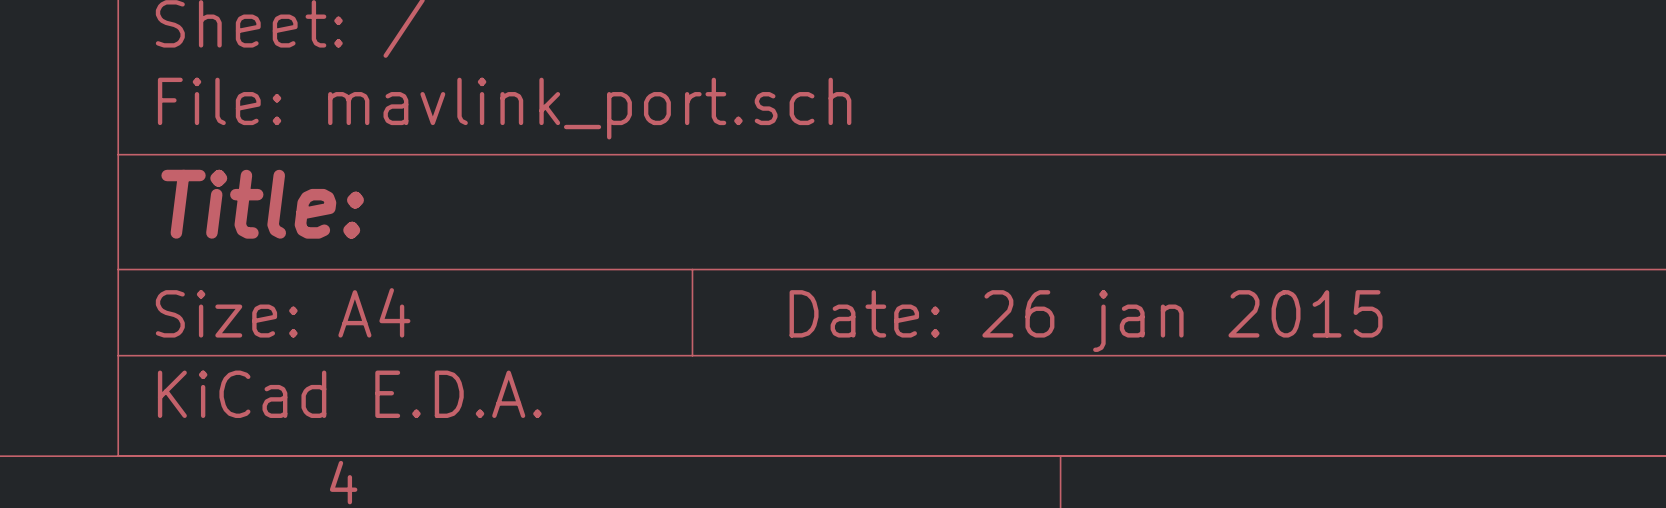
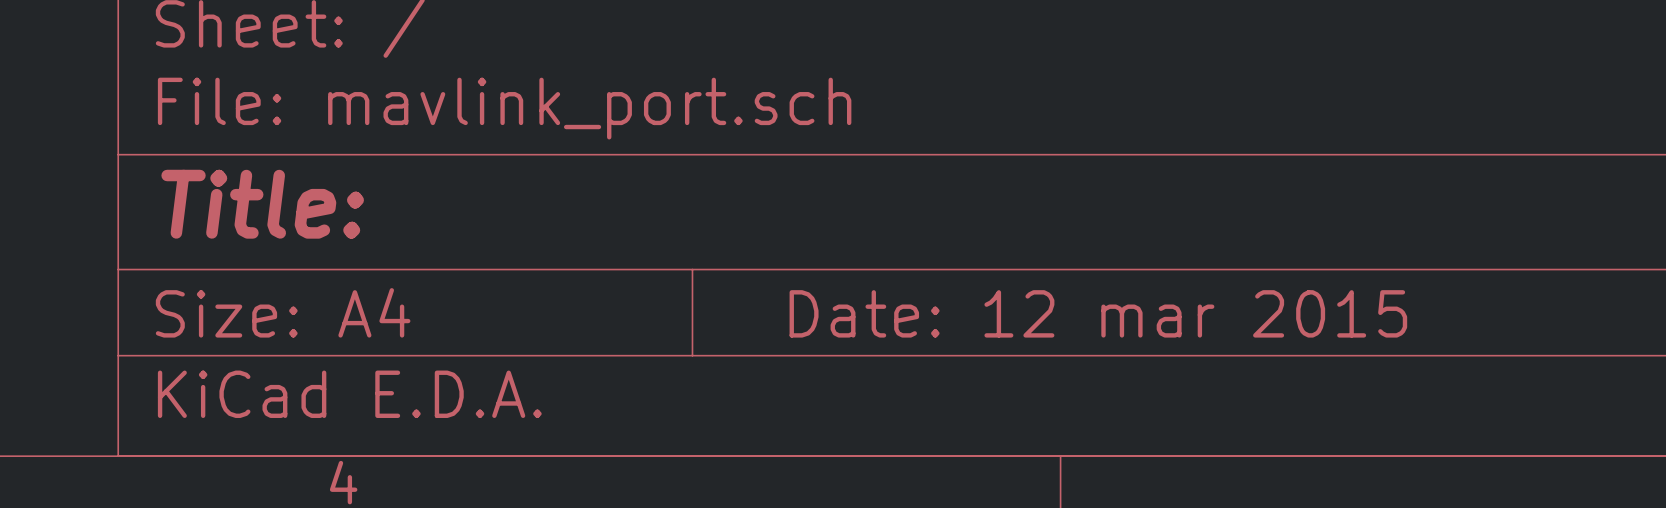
title block: Date: 26 jan 2015 (1086, 321) -> Date: 12 mar 2015 (1098, 313)

